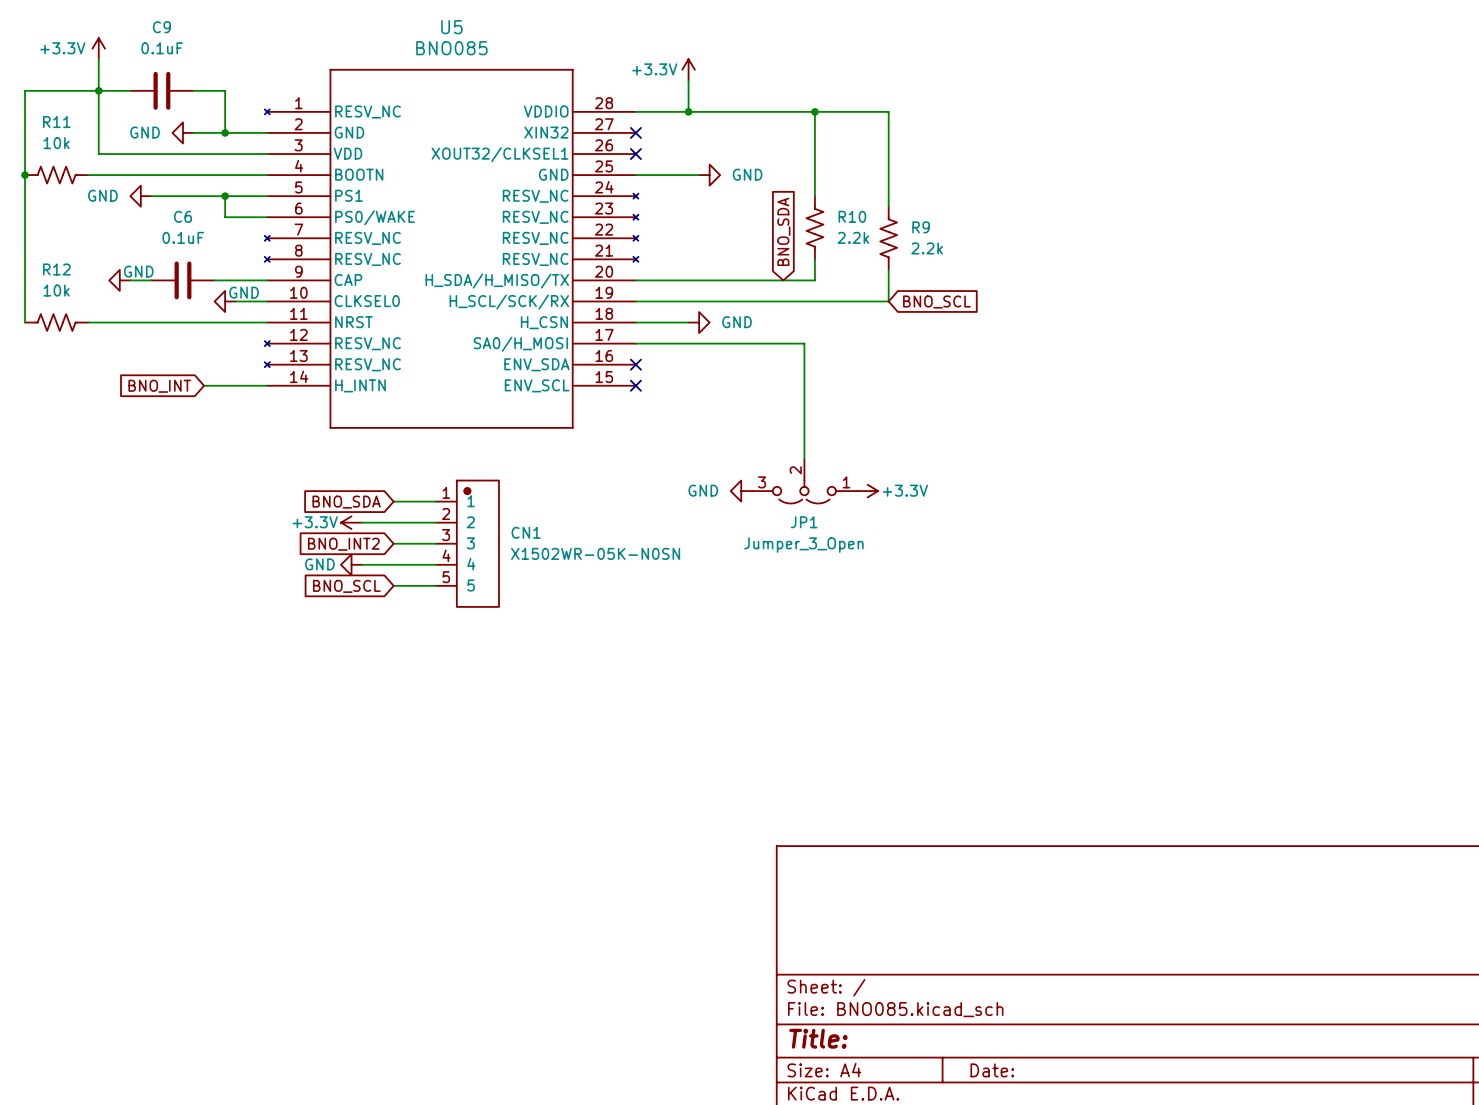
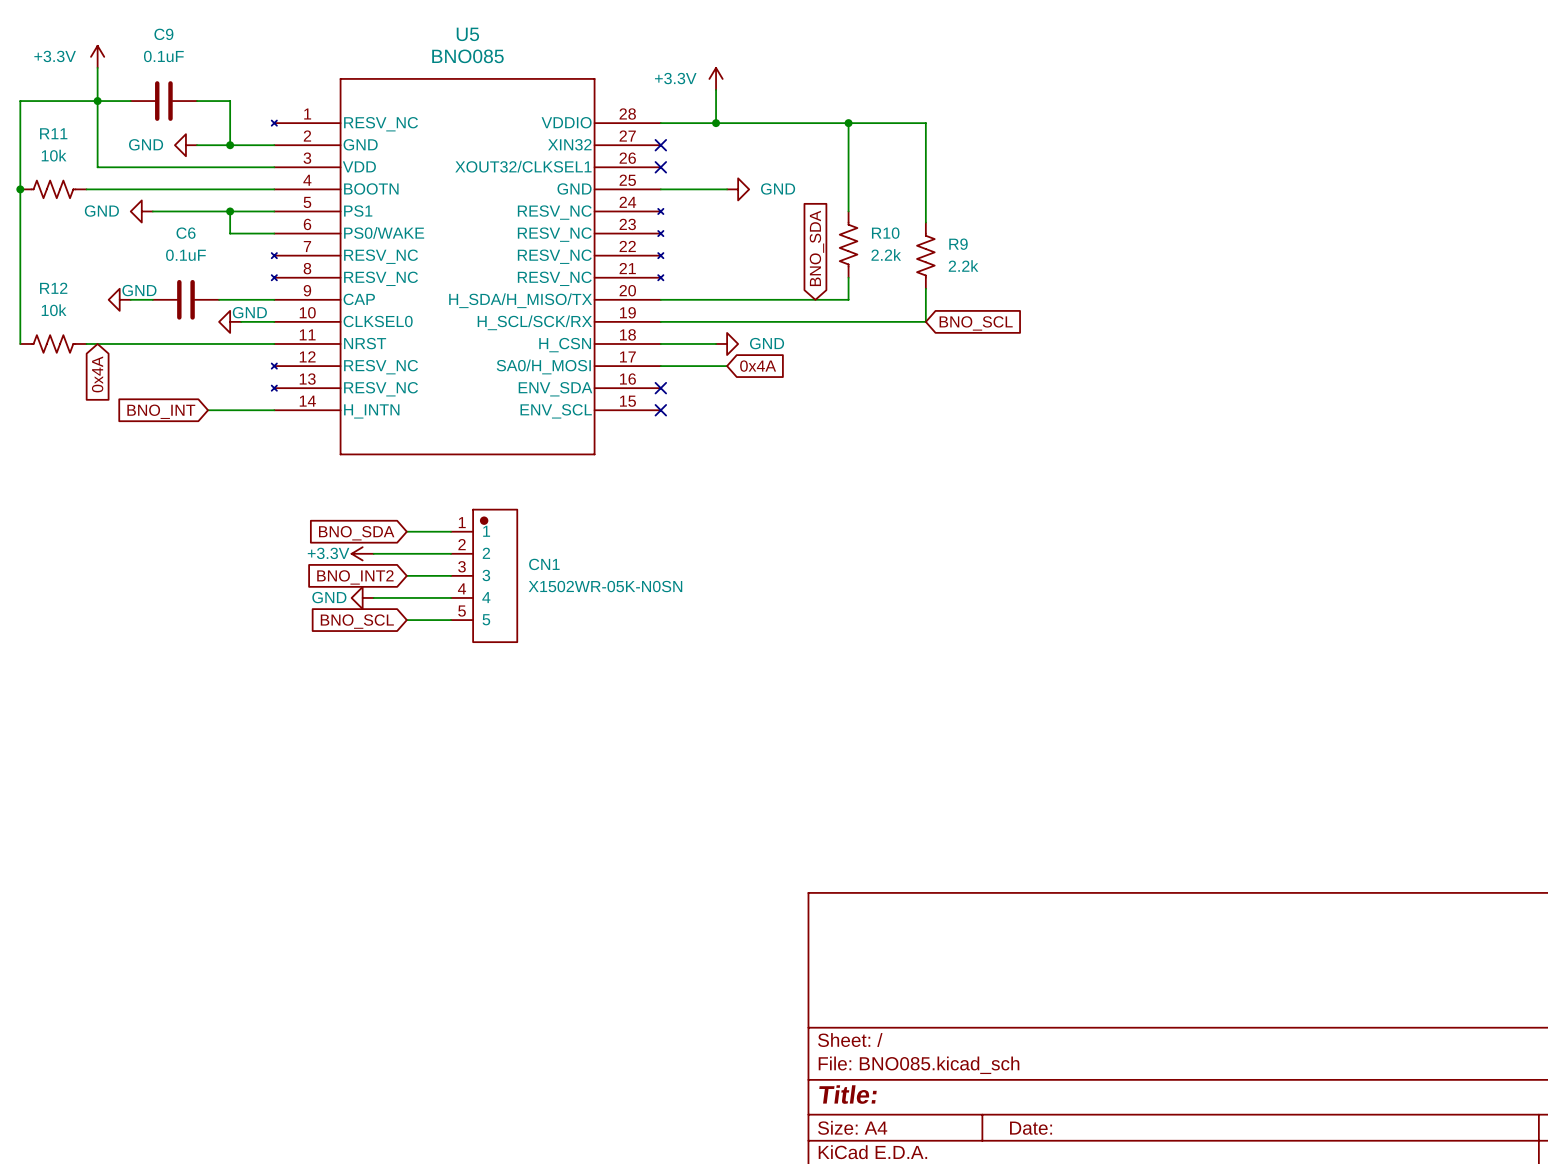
wire: (699, 343) (804, 343) (804, 459) -> none
global label: none -> 0x4A (758, 366)
global label: none -> 0x4A (97, 374)
JP1: Jumper_3_Open (804, 481) -> none
power symbol: GND (741, 491) -> none
power symbol: +3.3V (867, 491) -> none

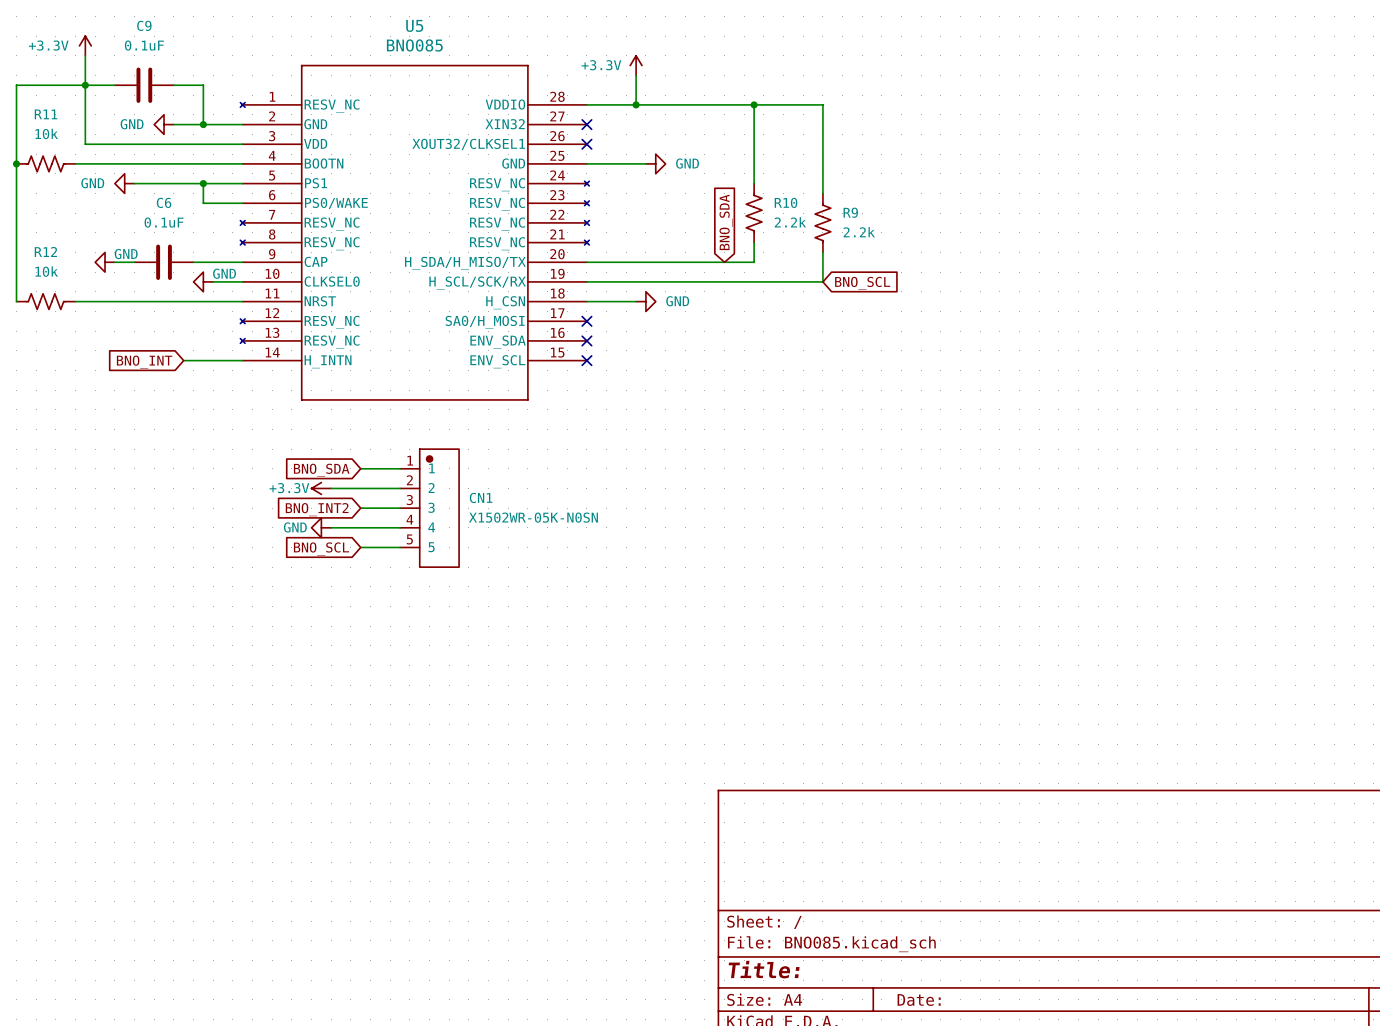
wire: (660, 366) (727, 366) -> none
no-connect mark: none -> (586, 321)
global label: 0x4A (758, 366) -> none
global label: 0x4A (97, 374) -> none

